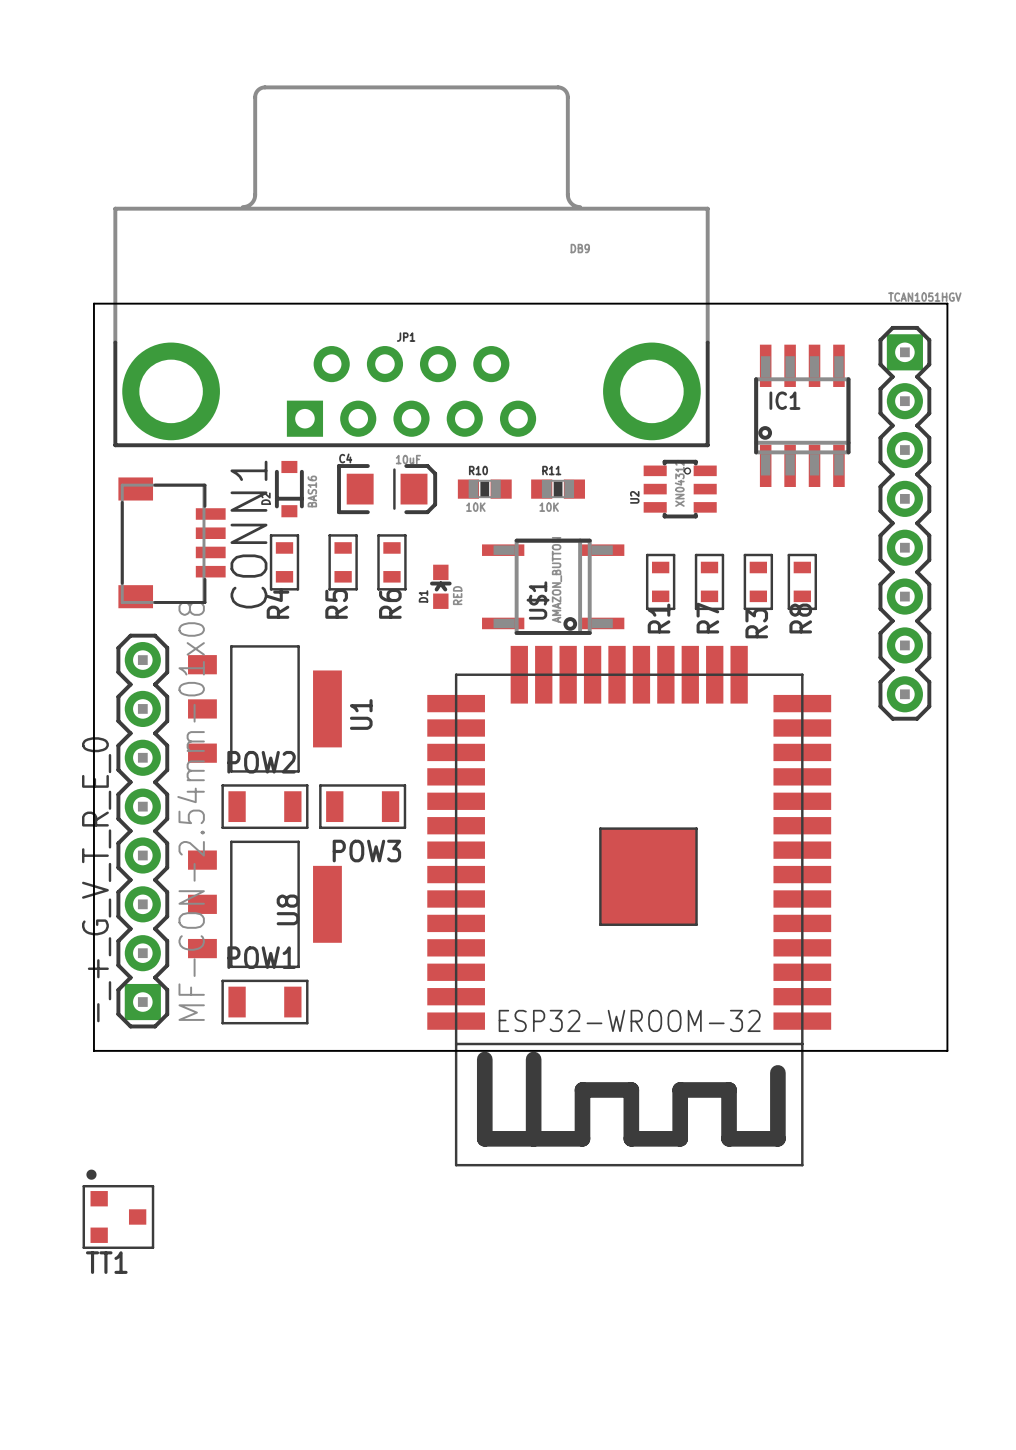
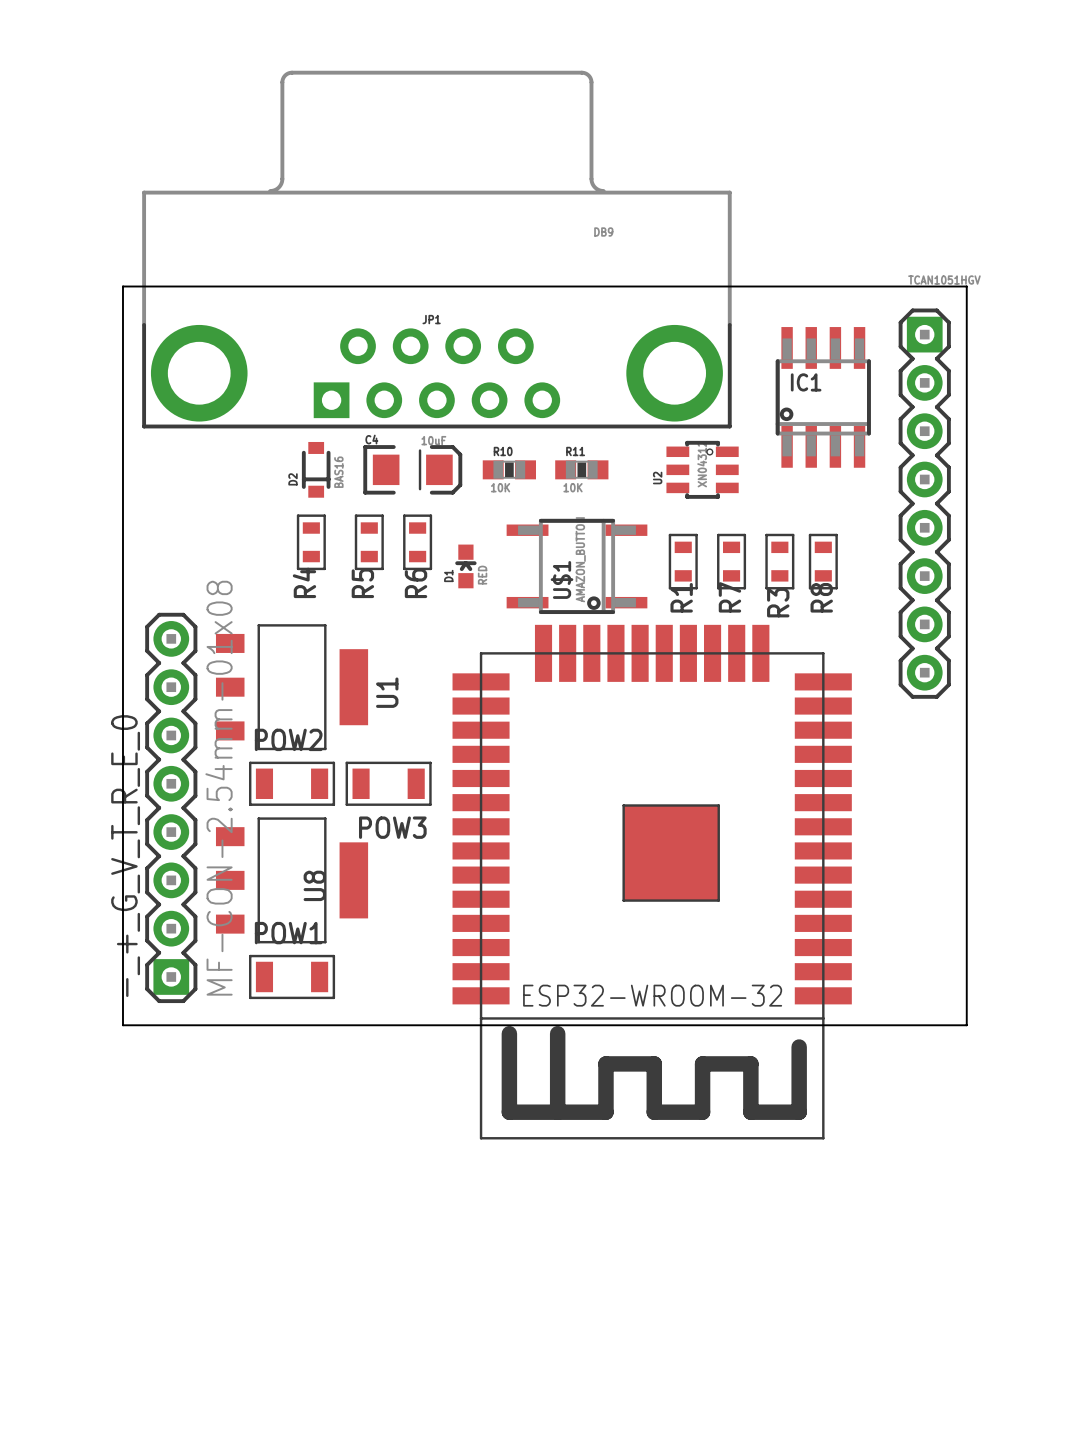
CONN1: (172, 542) -> none
TT1: (118, 1209) -> none

